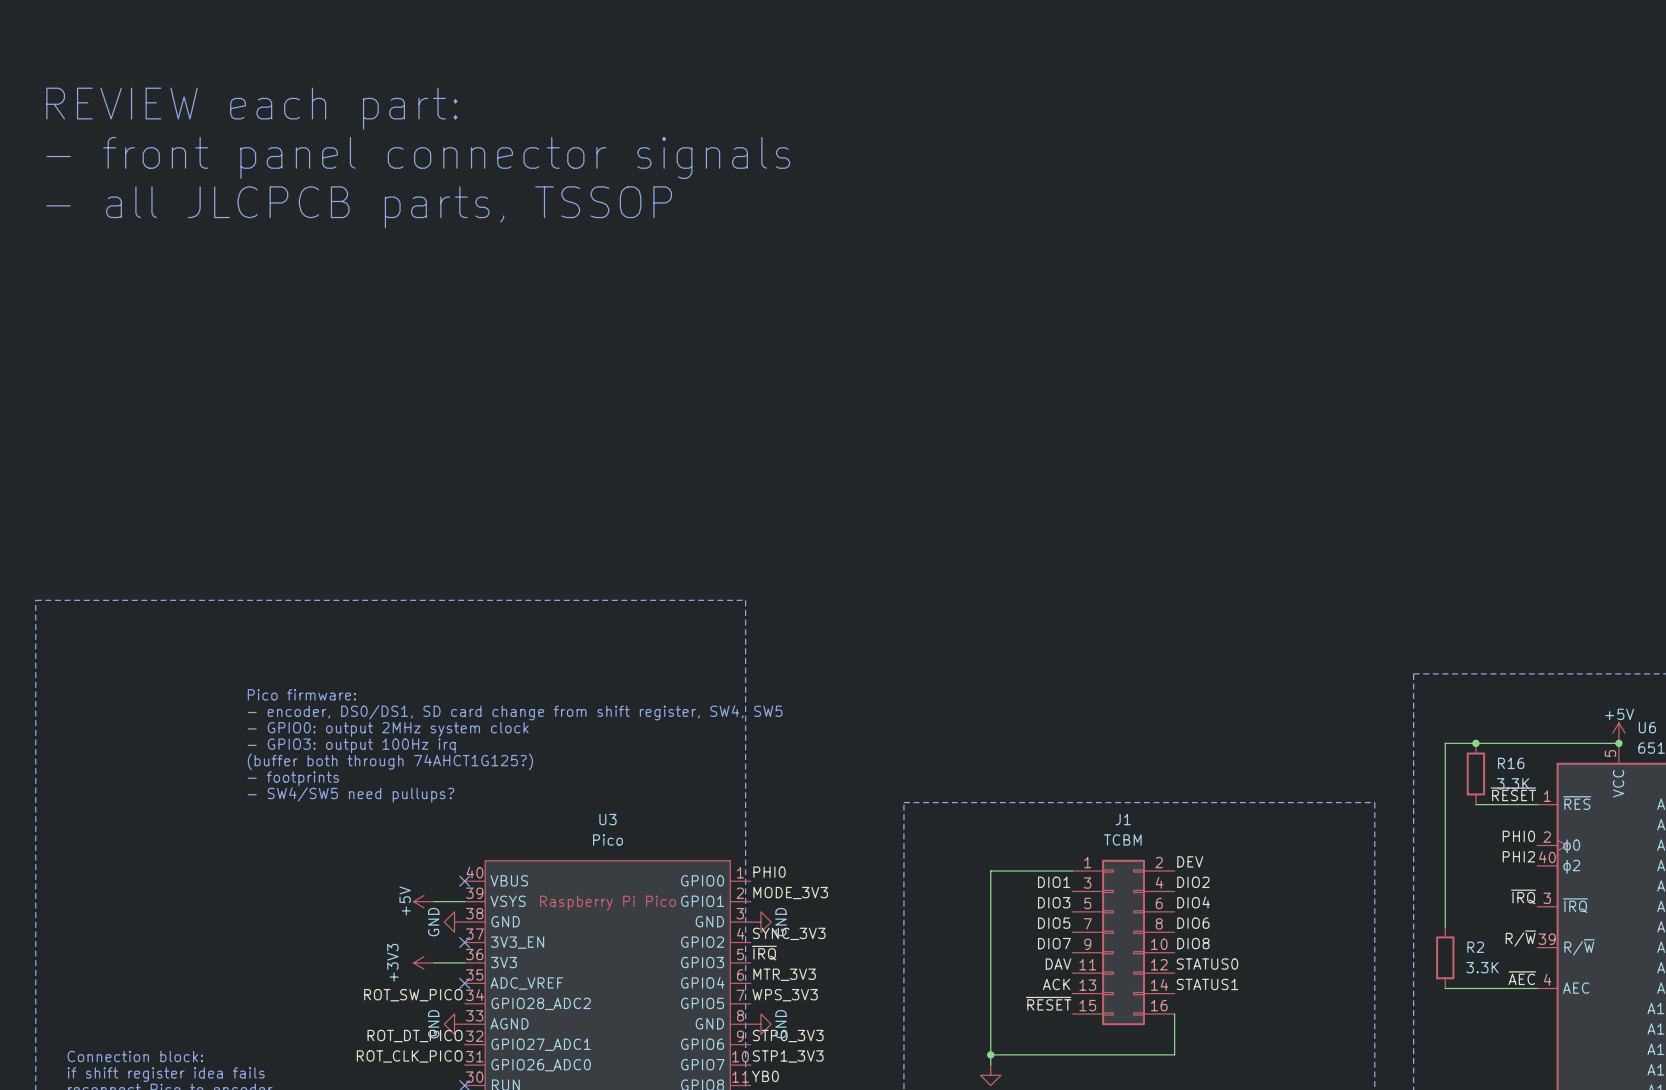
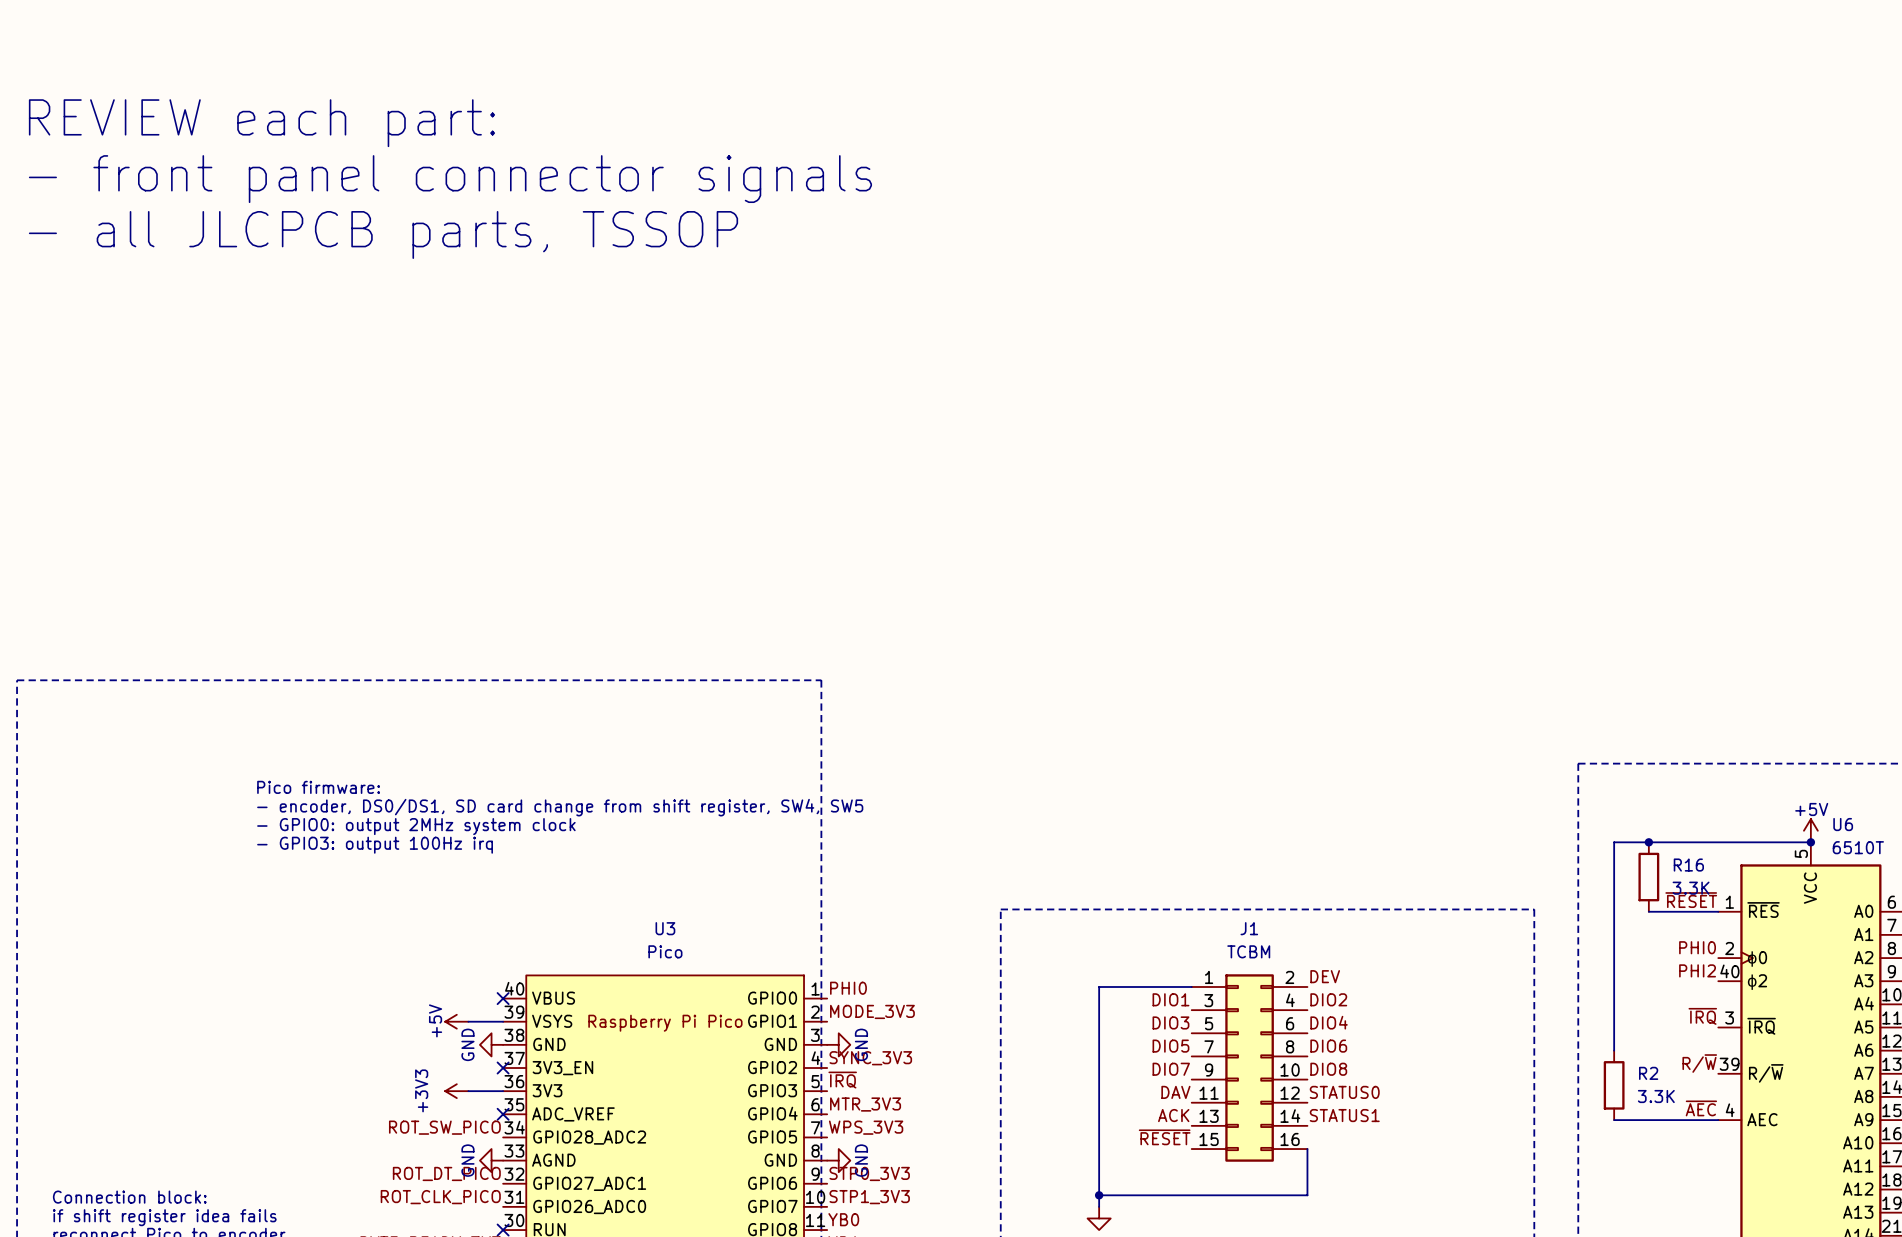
text: (buffer both through 74AHCT1G125?) (390, 761) -> none
text: - footprints (293, 778) -> none
text: - SW4/SW5 need pullups? (351, 794) -> none

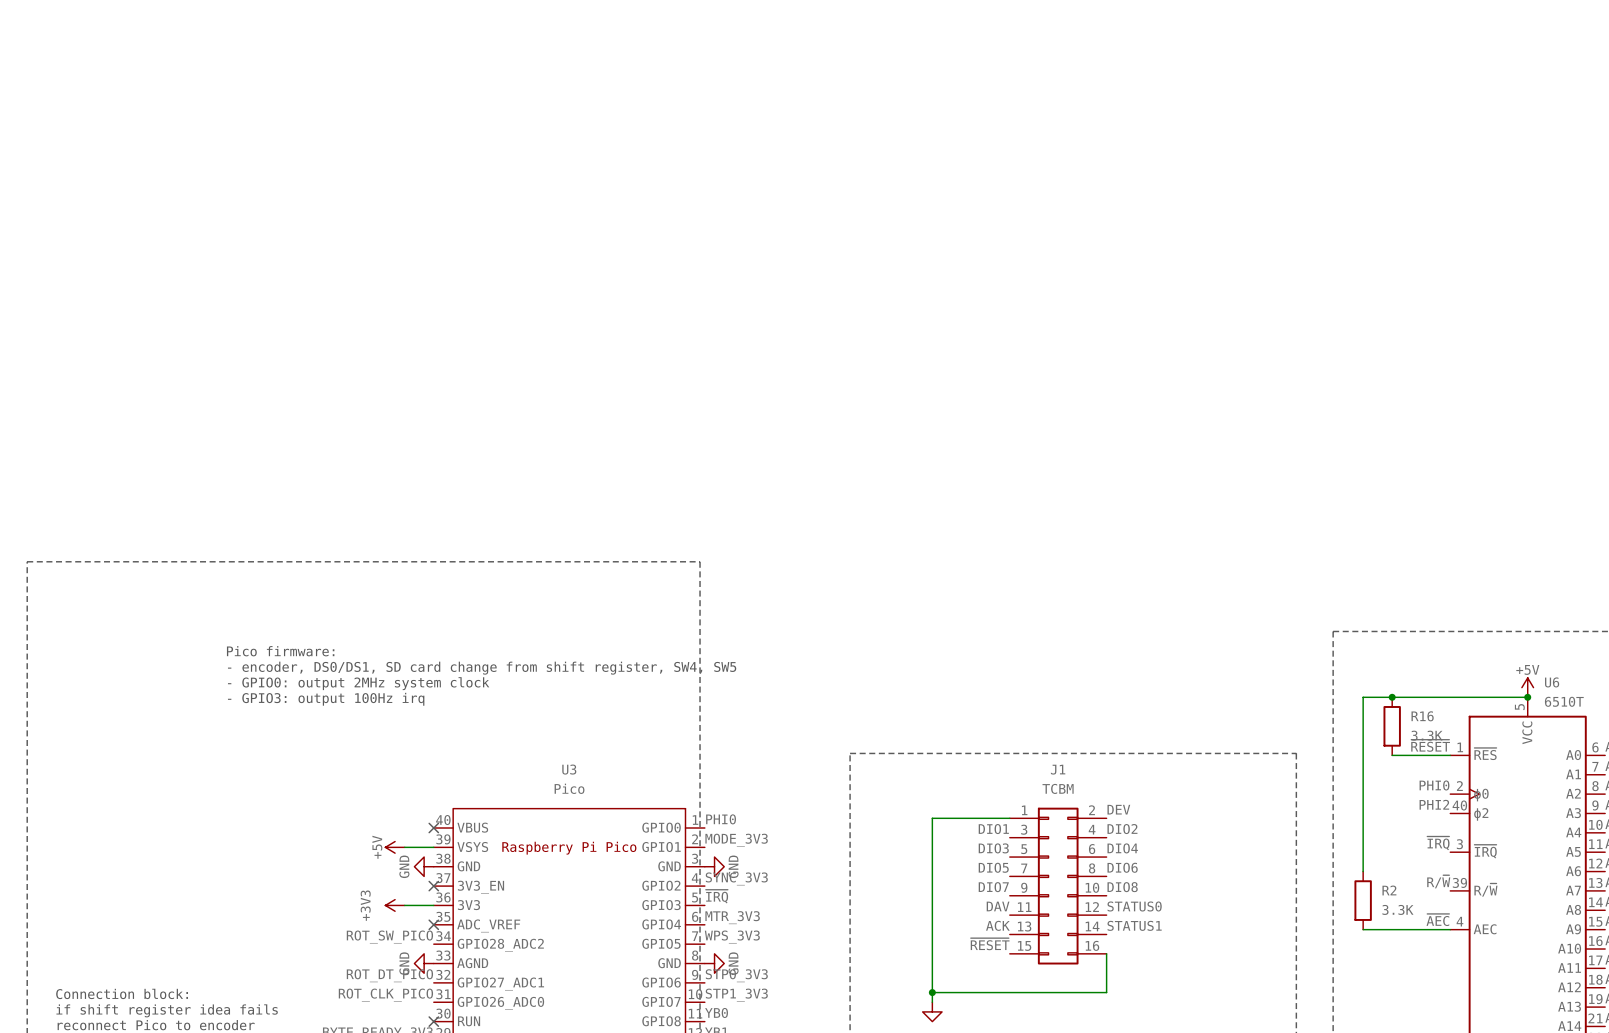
text: REVIEW each part: (261, 123) -> none
text: - front panel connector signals (450, 179) -> none
text: - all JLCPCB parts, TSSOP (383, 234) -> none

